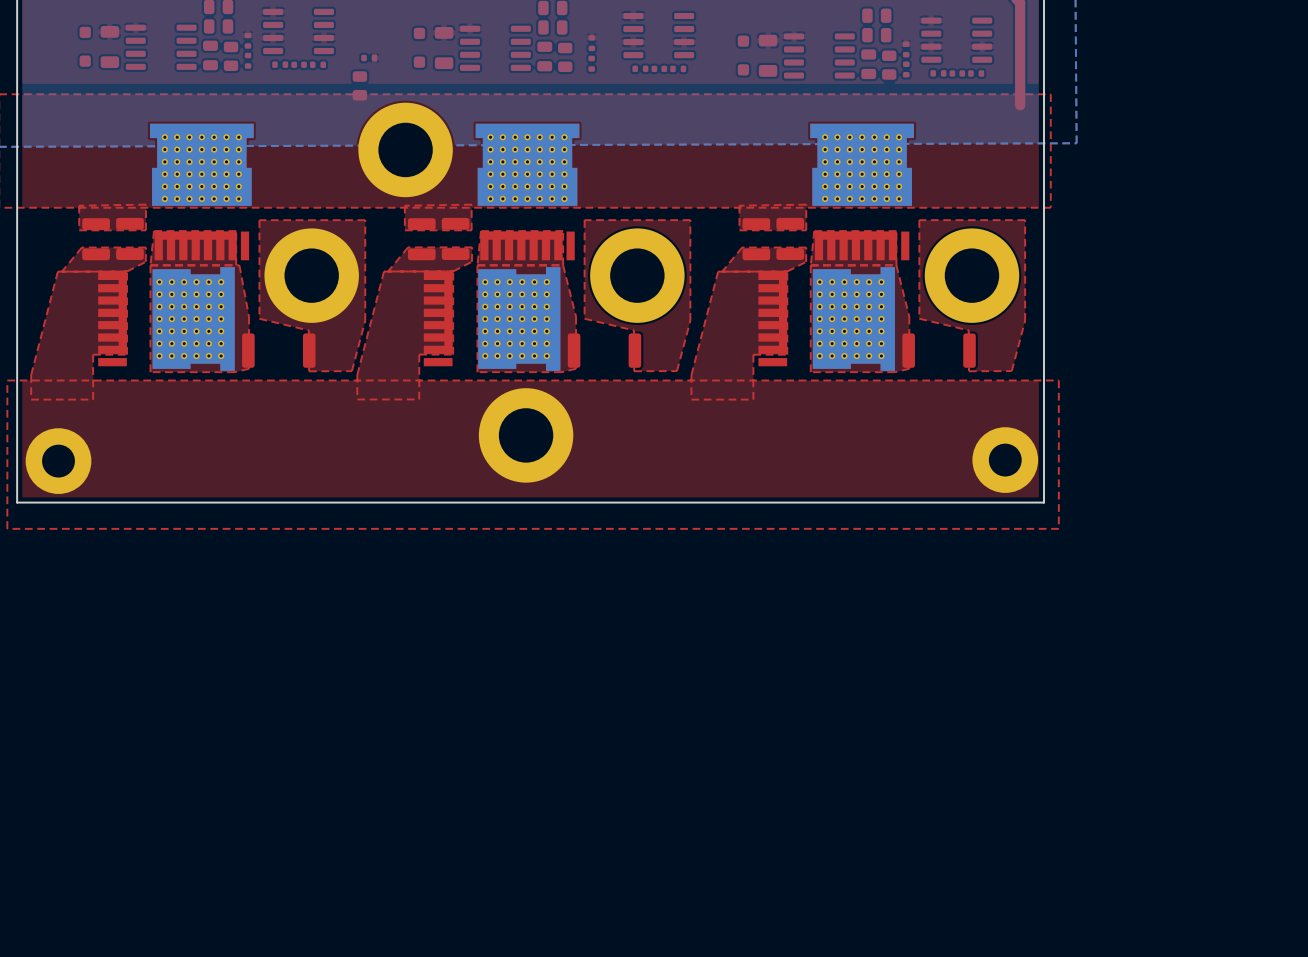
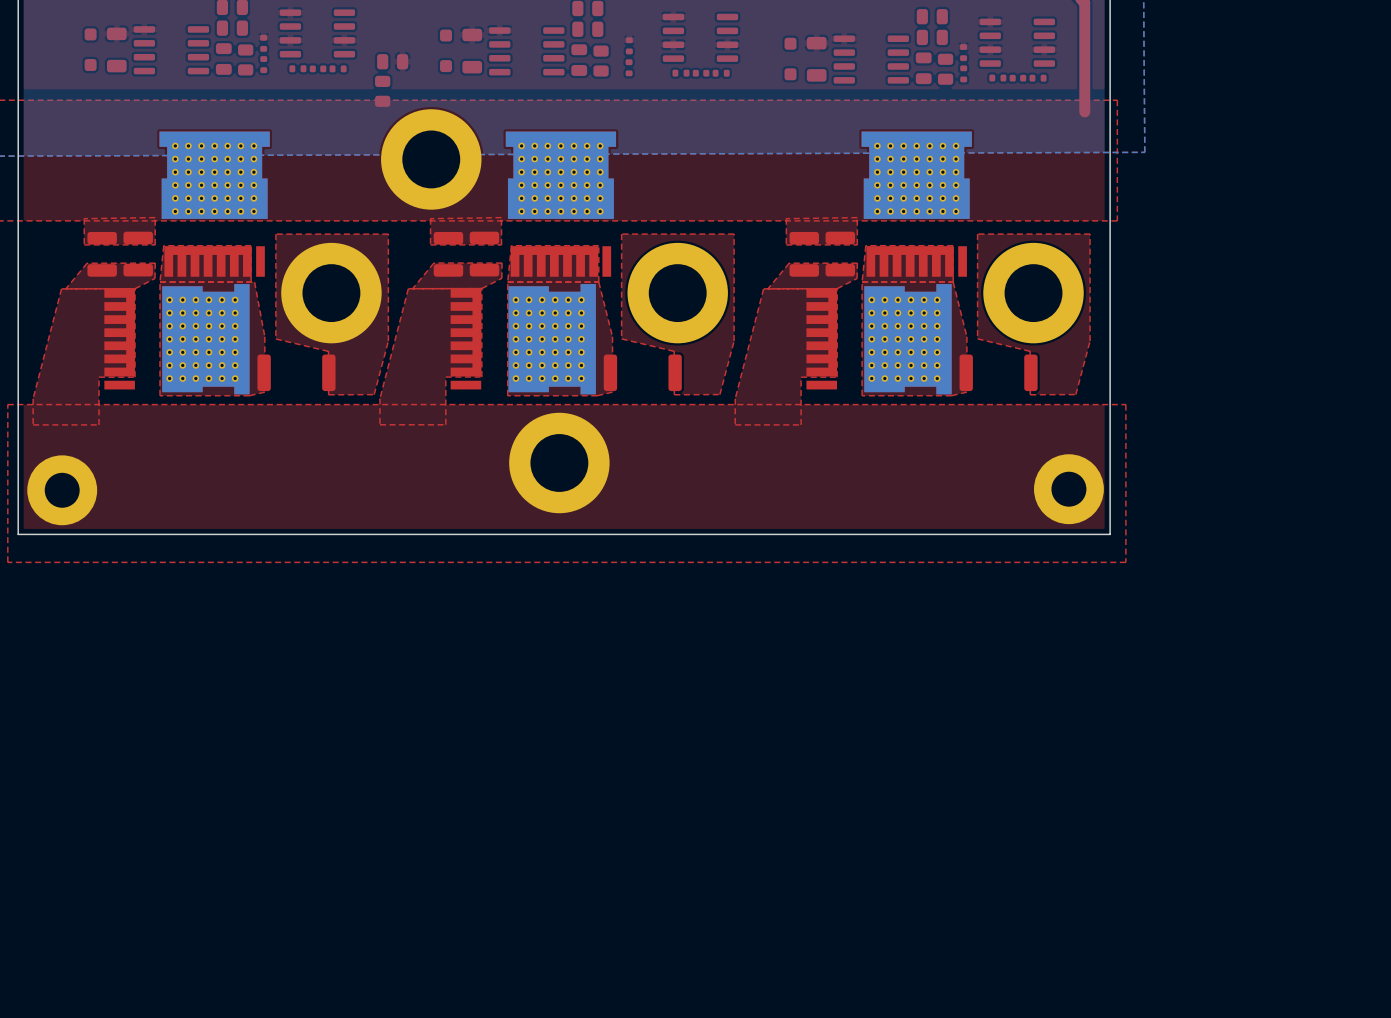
part footprint: [361, 54, 378, 62] -> [377, 54, 409, 70]

